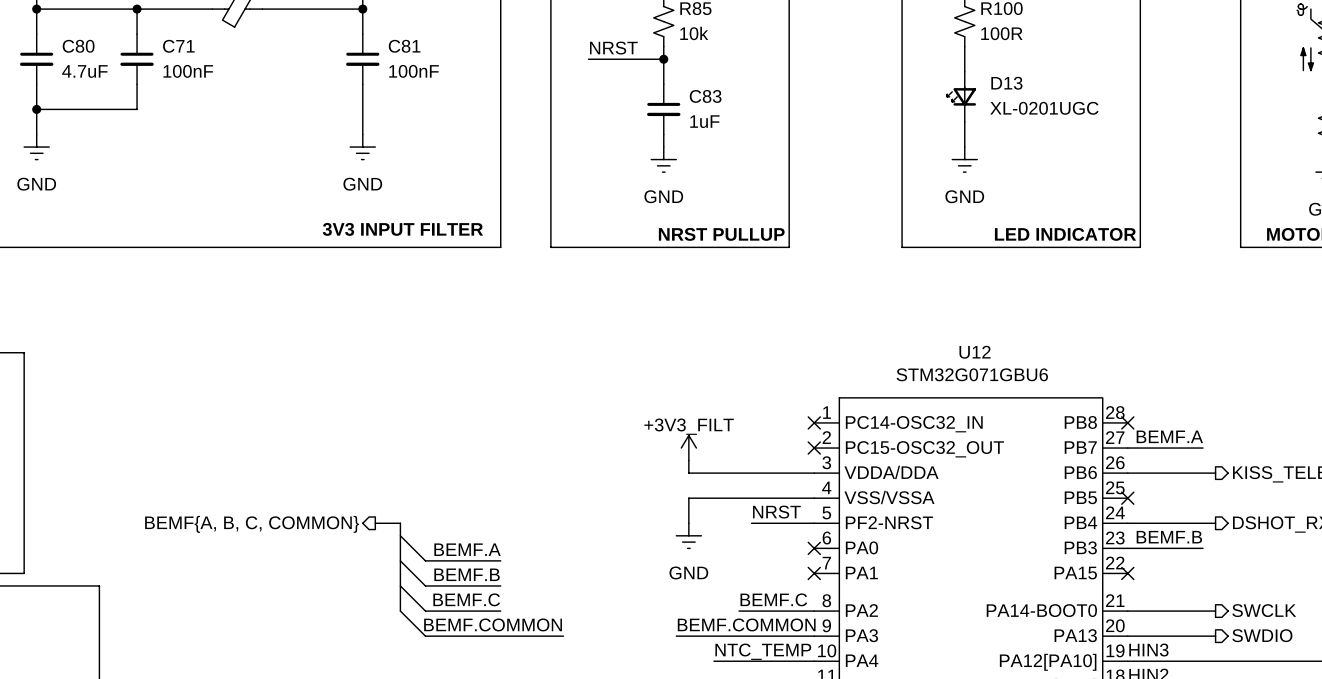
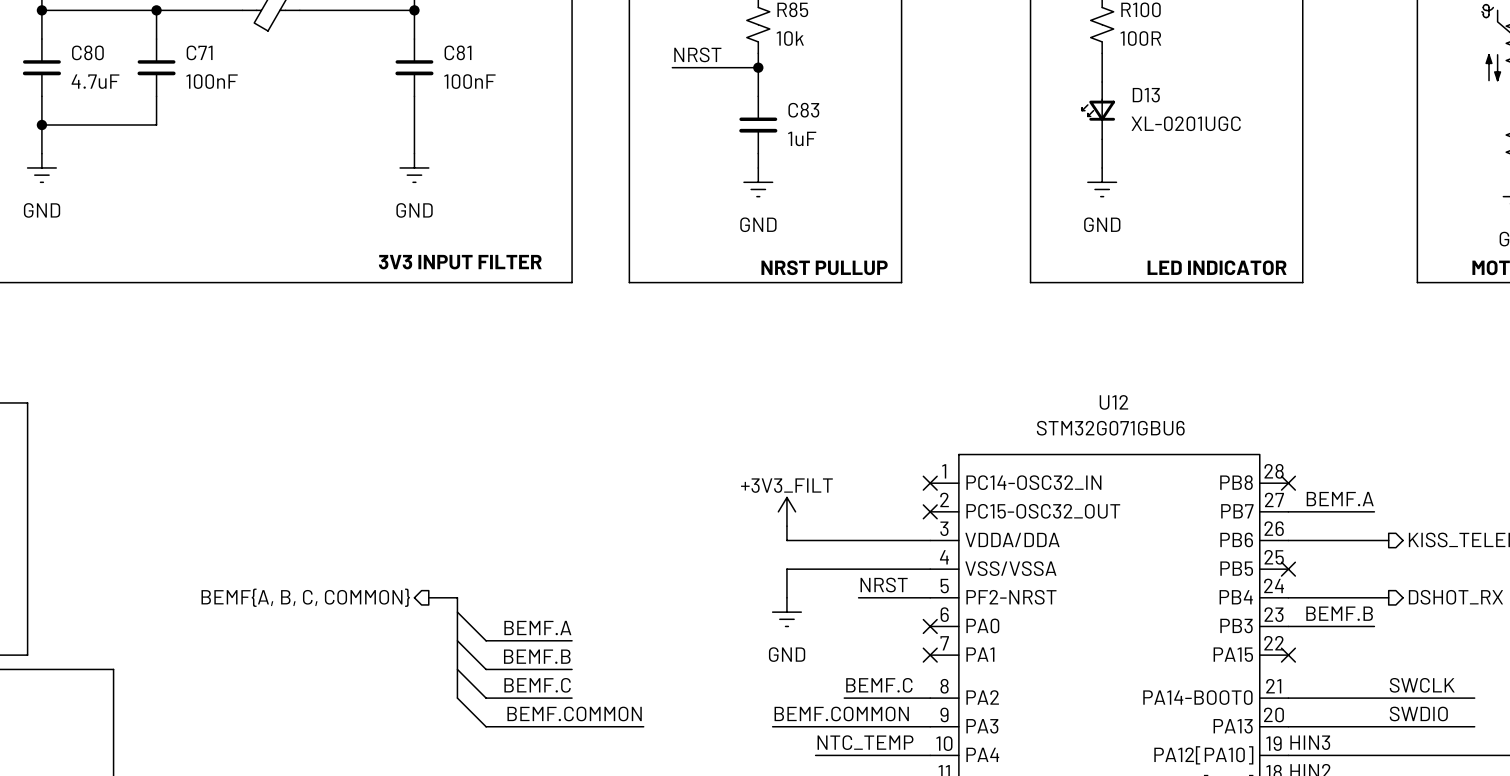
label: none -> SWCLK (1422, 685)
hierarchical label: SWCLK (1264, 610) -> none
wire: none -> (1388, 698) (1474, 698)
label: none -> SWDIO (1418, 713)
hierarchical label: SWDIO (1262, 635) -> none
wire: none -> (1388, 726) (1474, 726)

